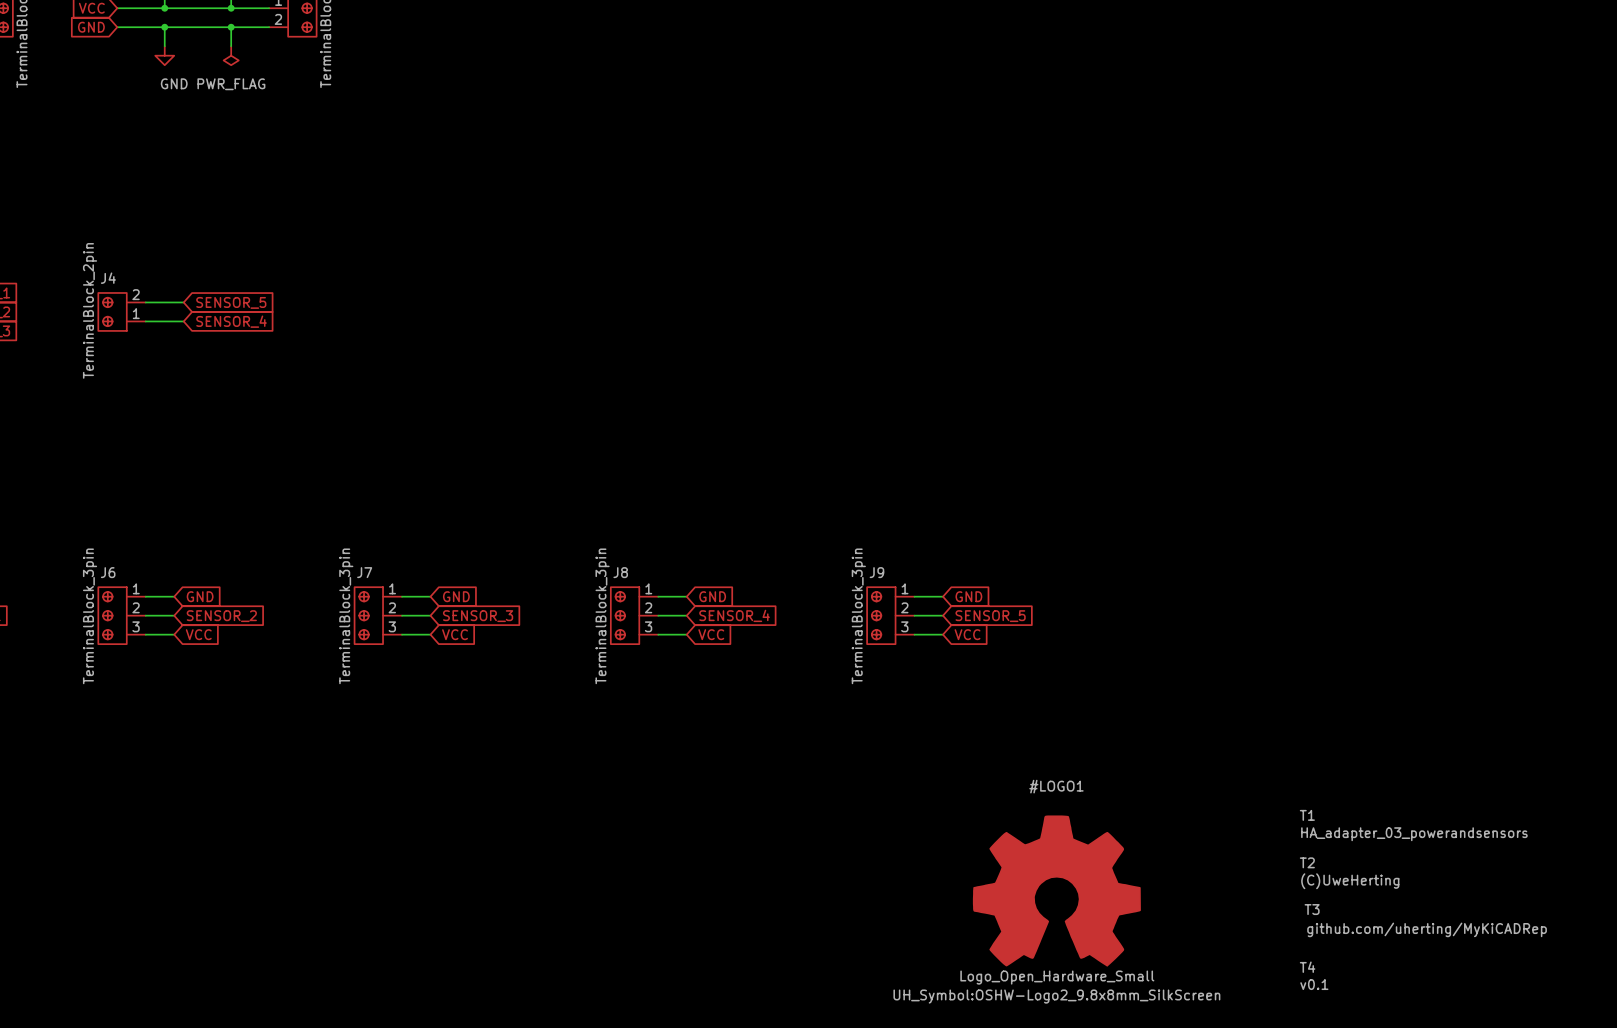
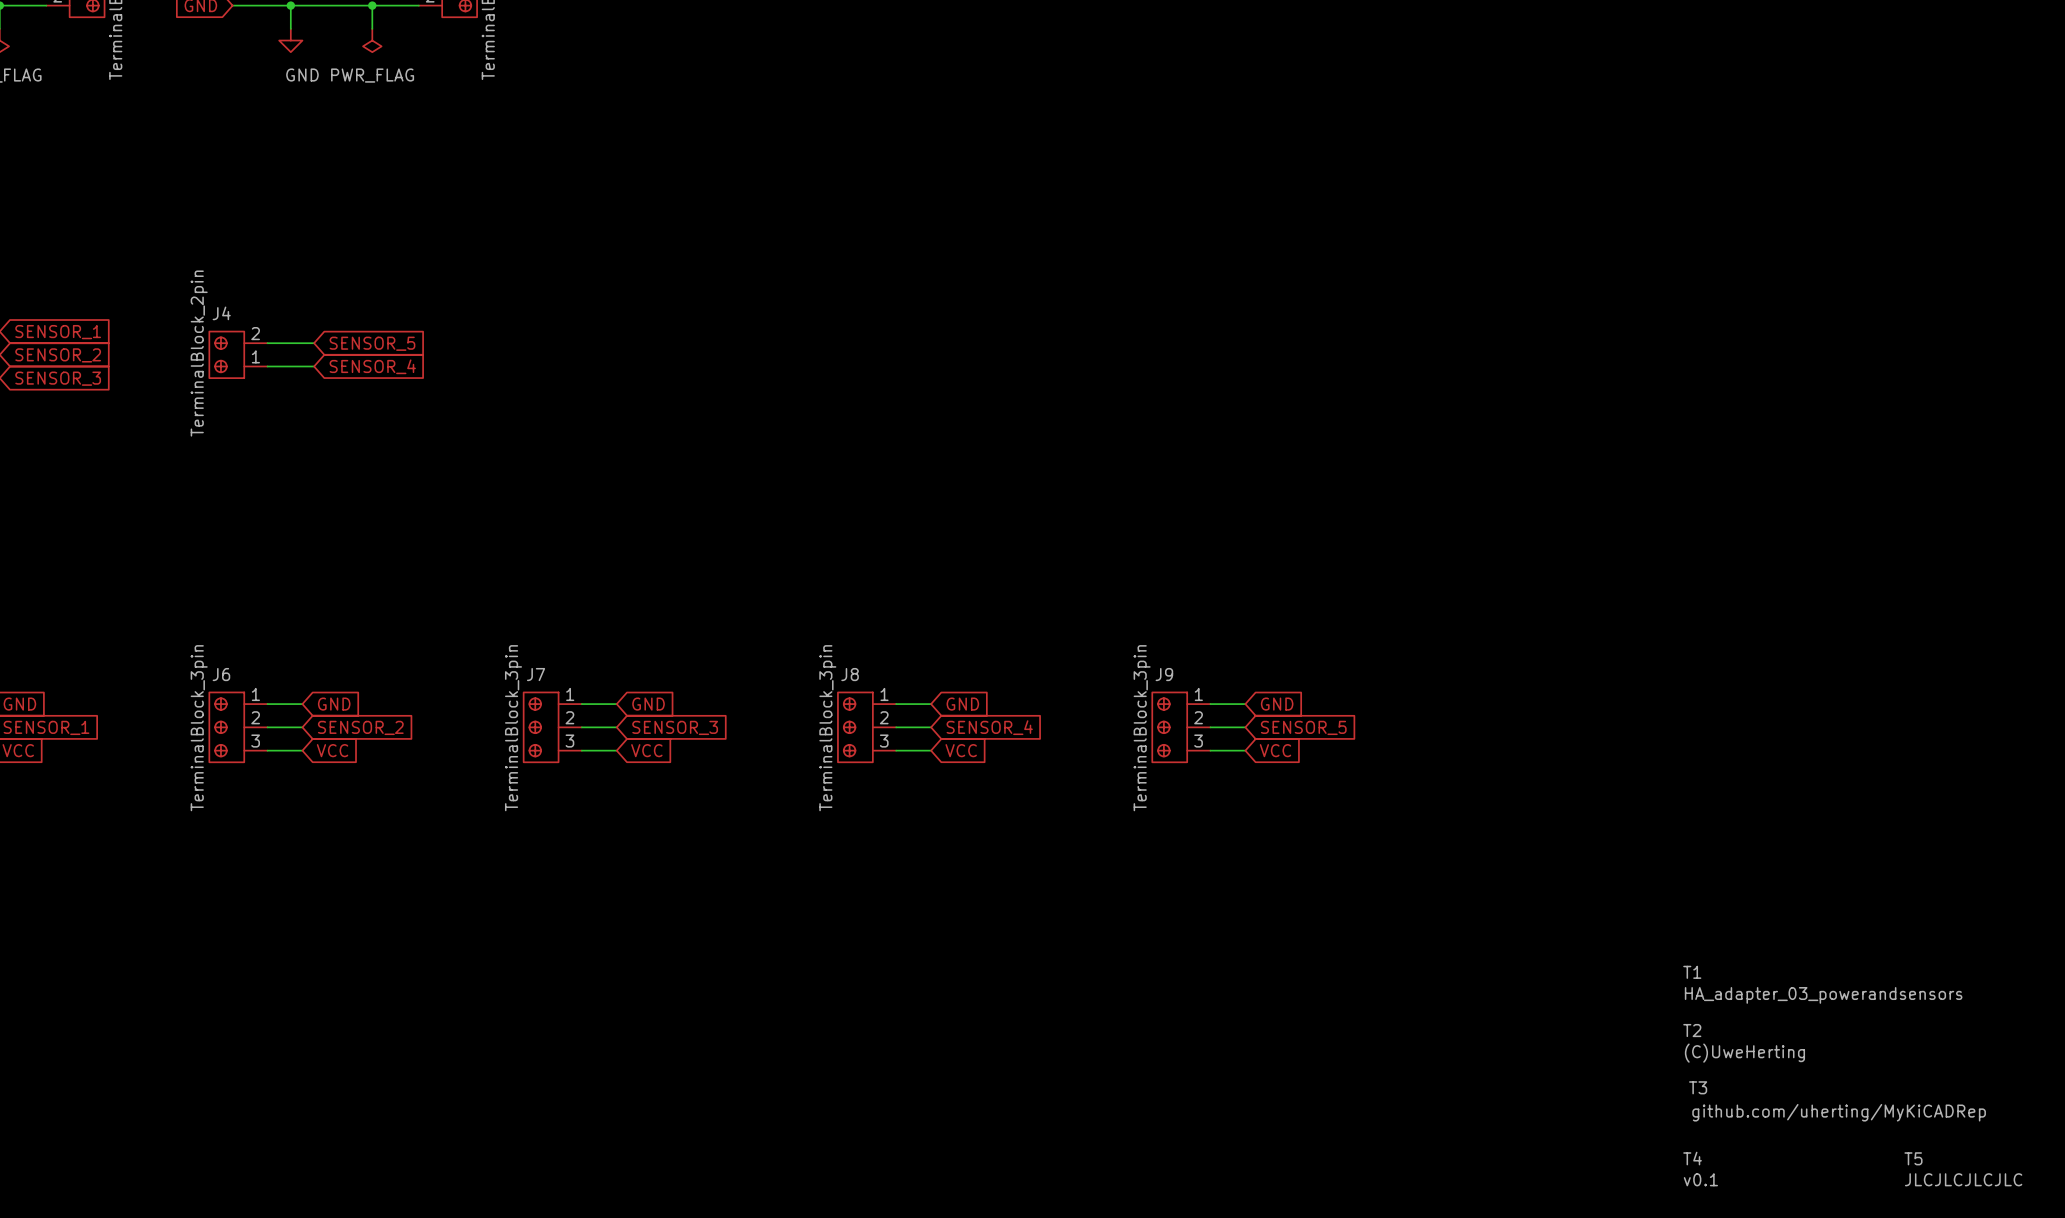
#LOGO1: Logo_Open_Hardware_Small (1056, 890) -> none
T5: none -> JLCJLCJLCJLC (1963, 1169)

